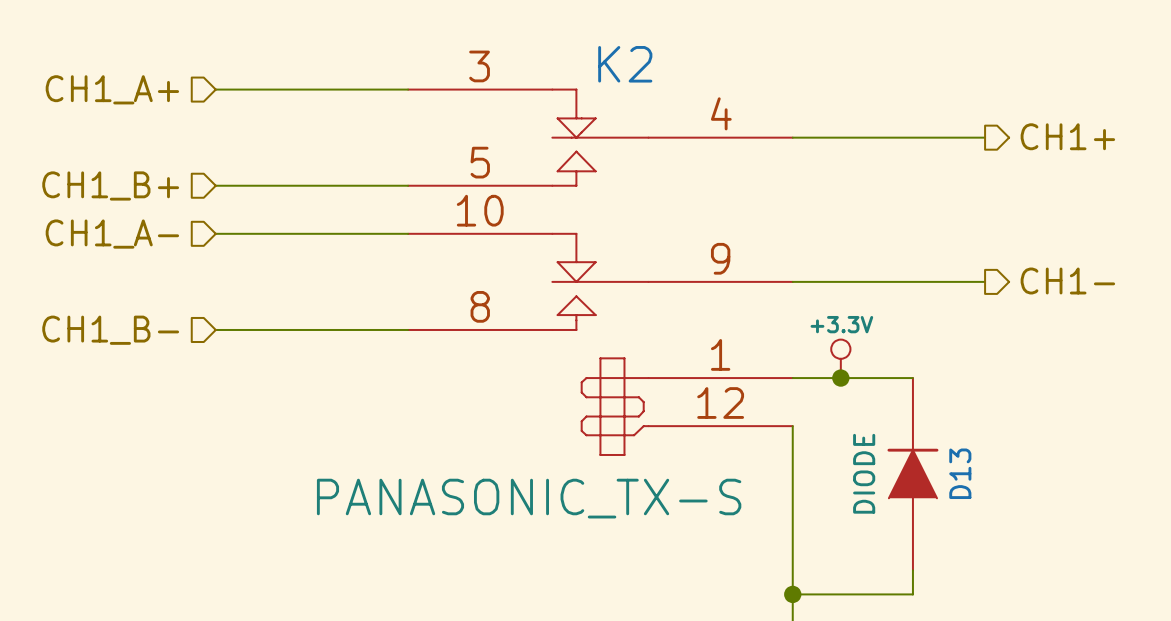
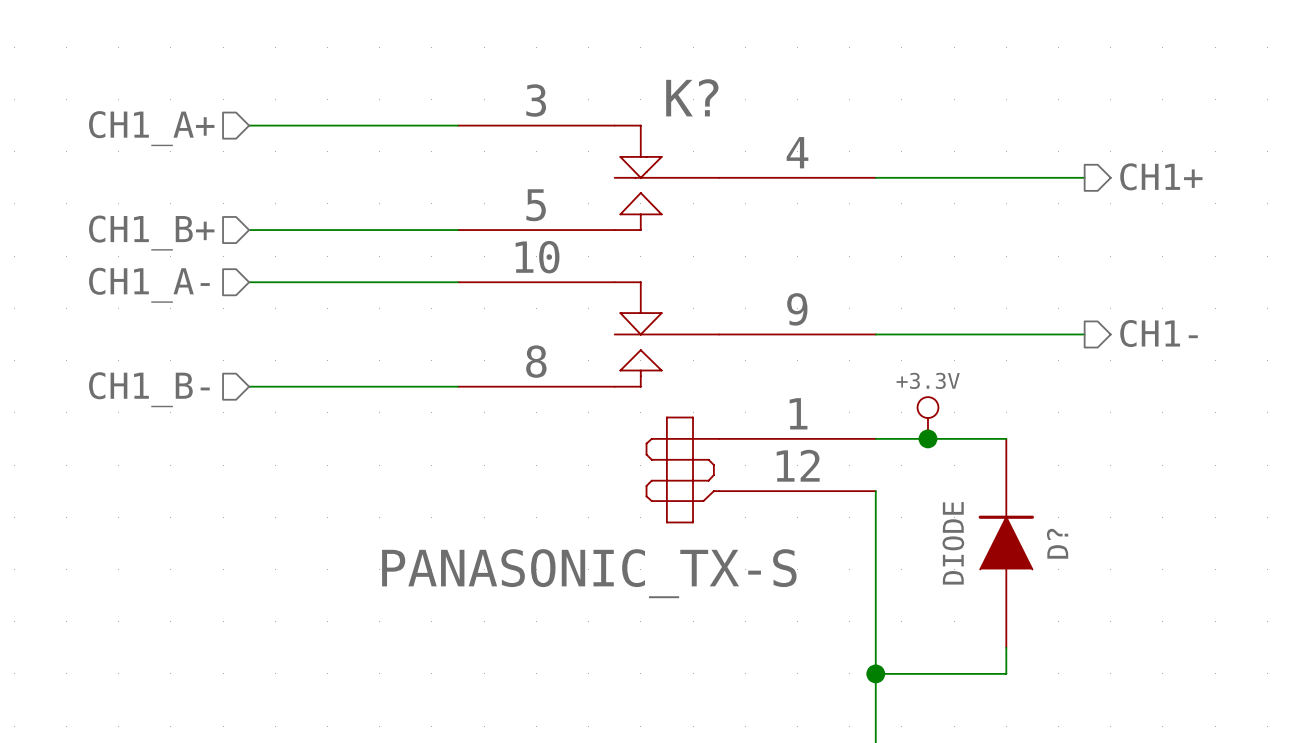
K2 name: K2 (625, 64) -> K? (692, 97)
D13 name: D13 (960, 473) -> D? (1057, 543)

